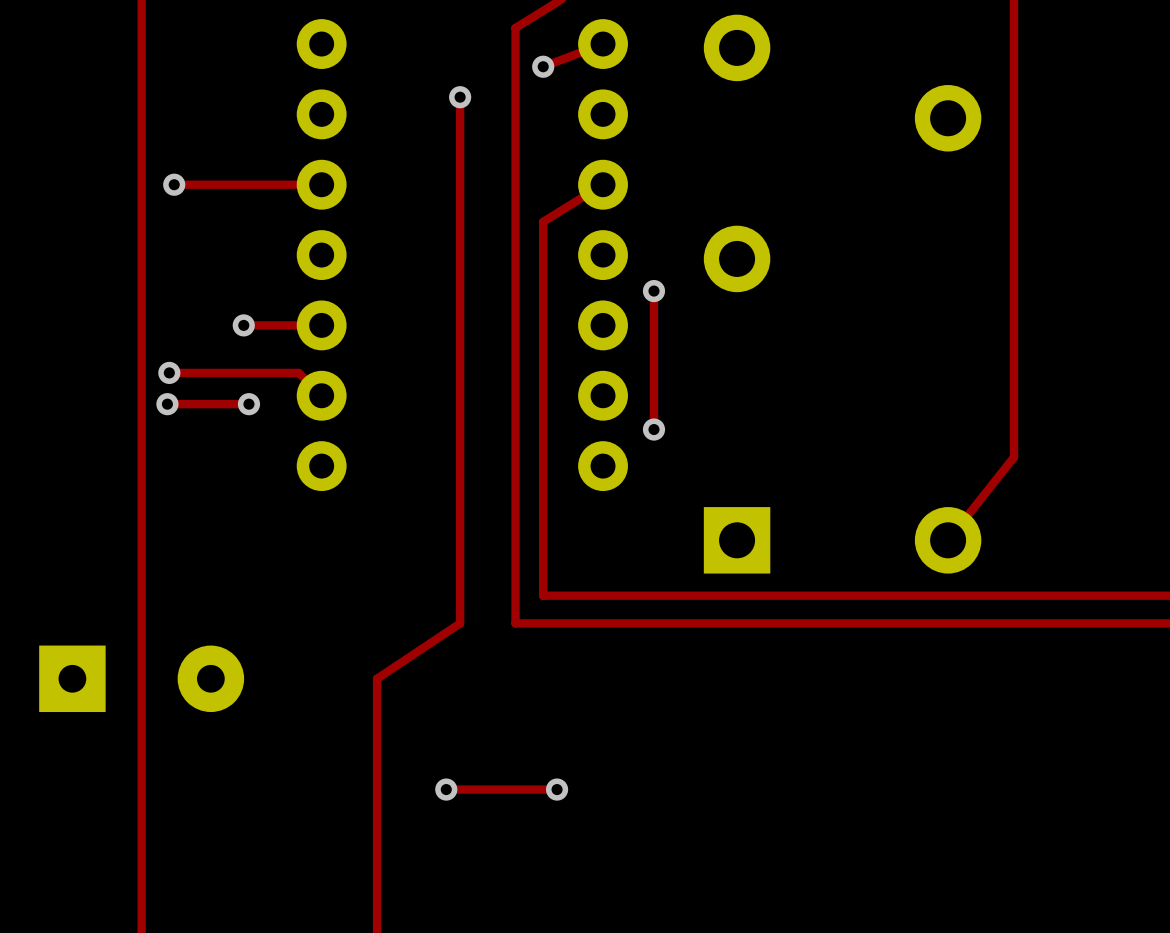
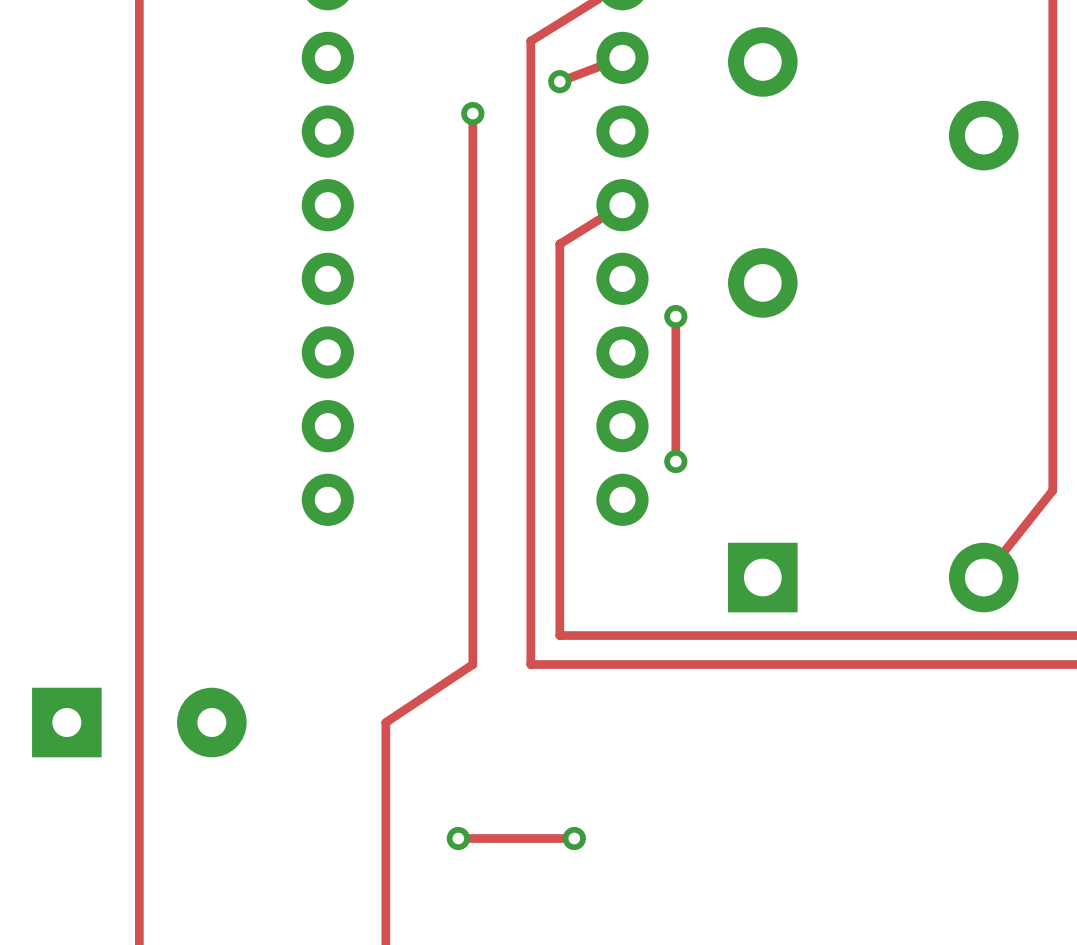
track: (174, 184) (321, 184) -> none
via: (174, 184) -> none
track: (243, 325) (321, 325) -> none
via: (243, 325) -> none
track: (169, 372) (298, 372) (321, 395) -> none
via: (169, 372) -> none
track: (167, 404) (248, 404) -> none
via: (167, 404) -> none
via: (248, 404) -> none

